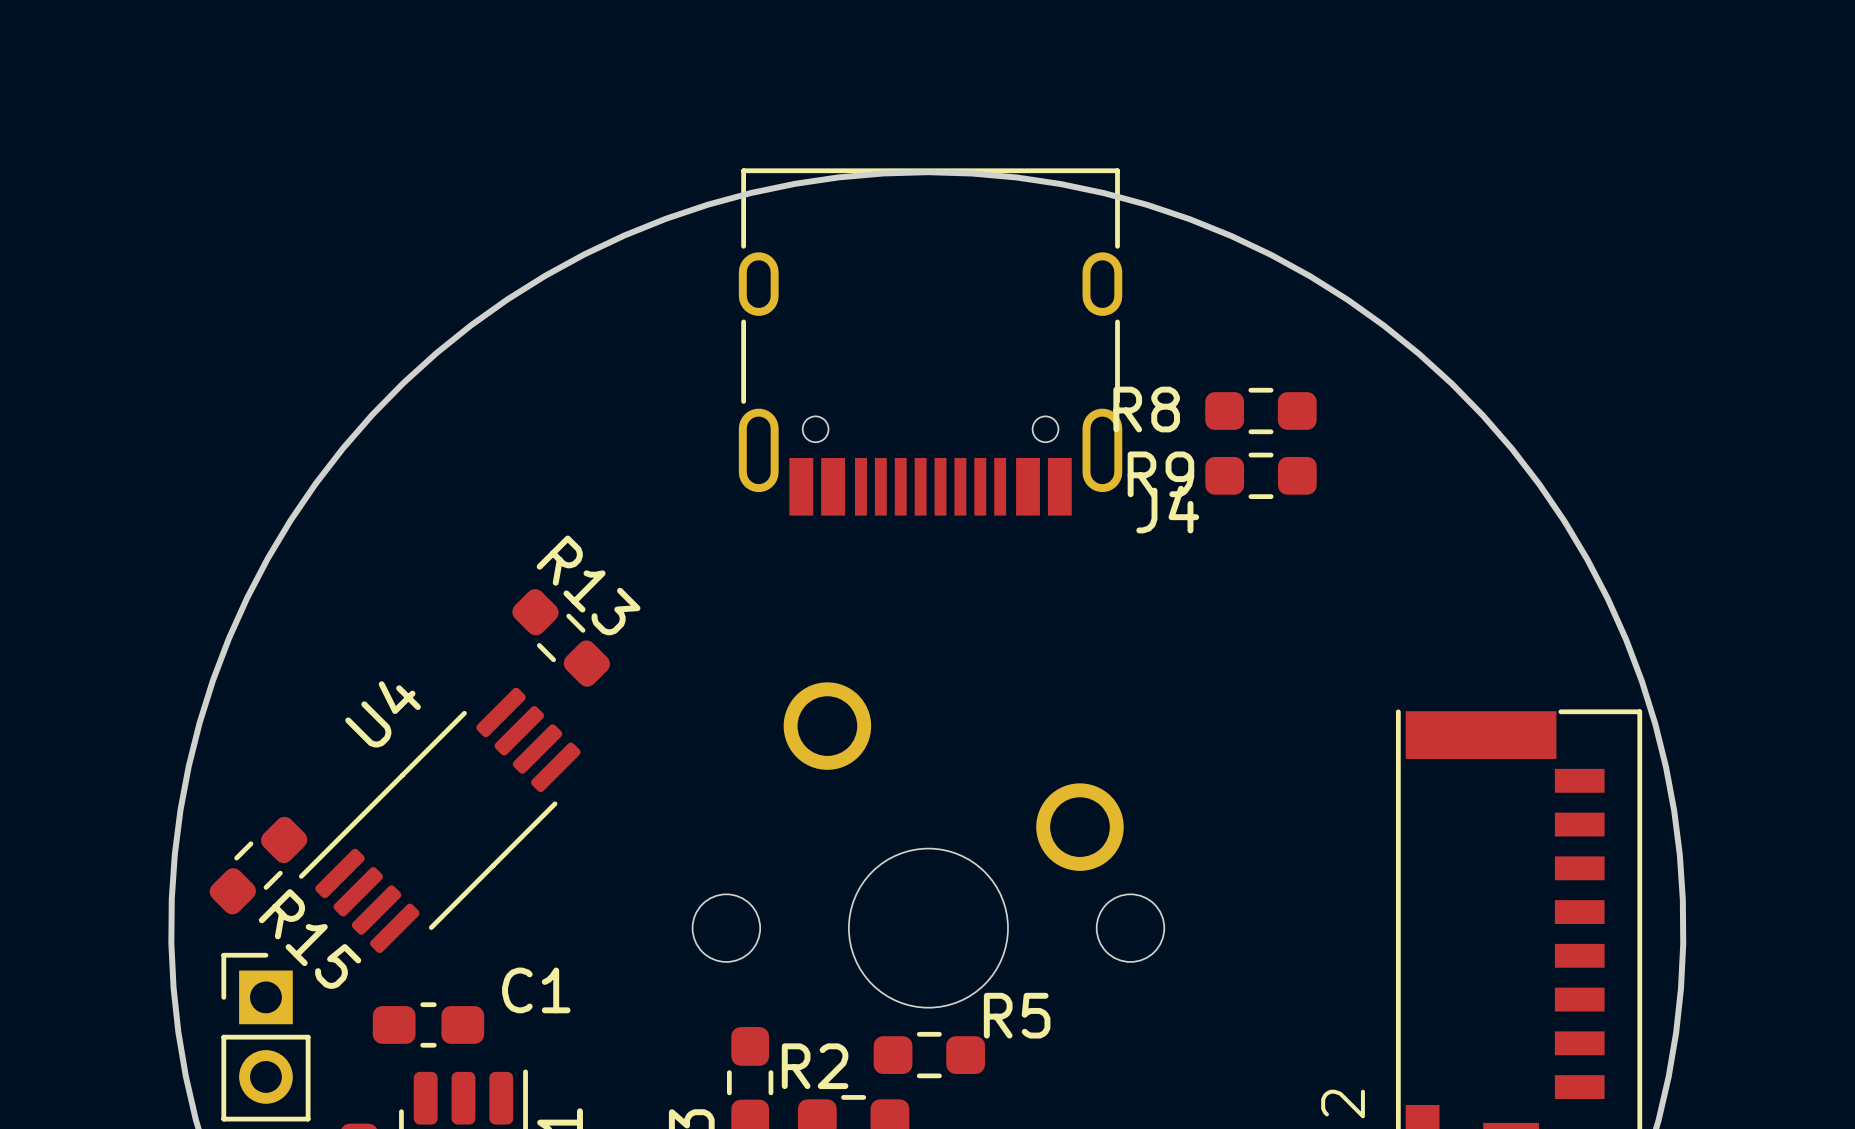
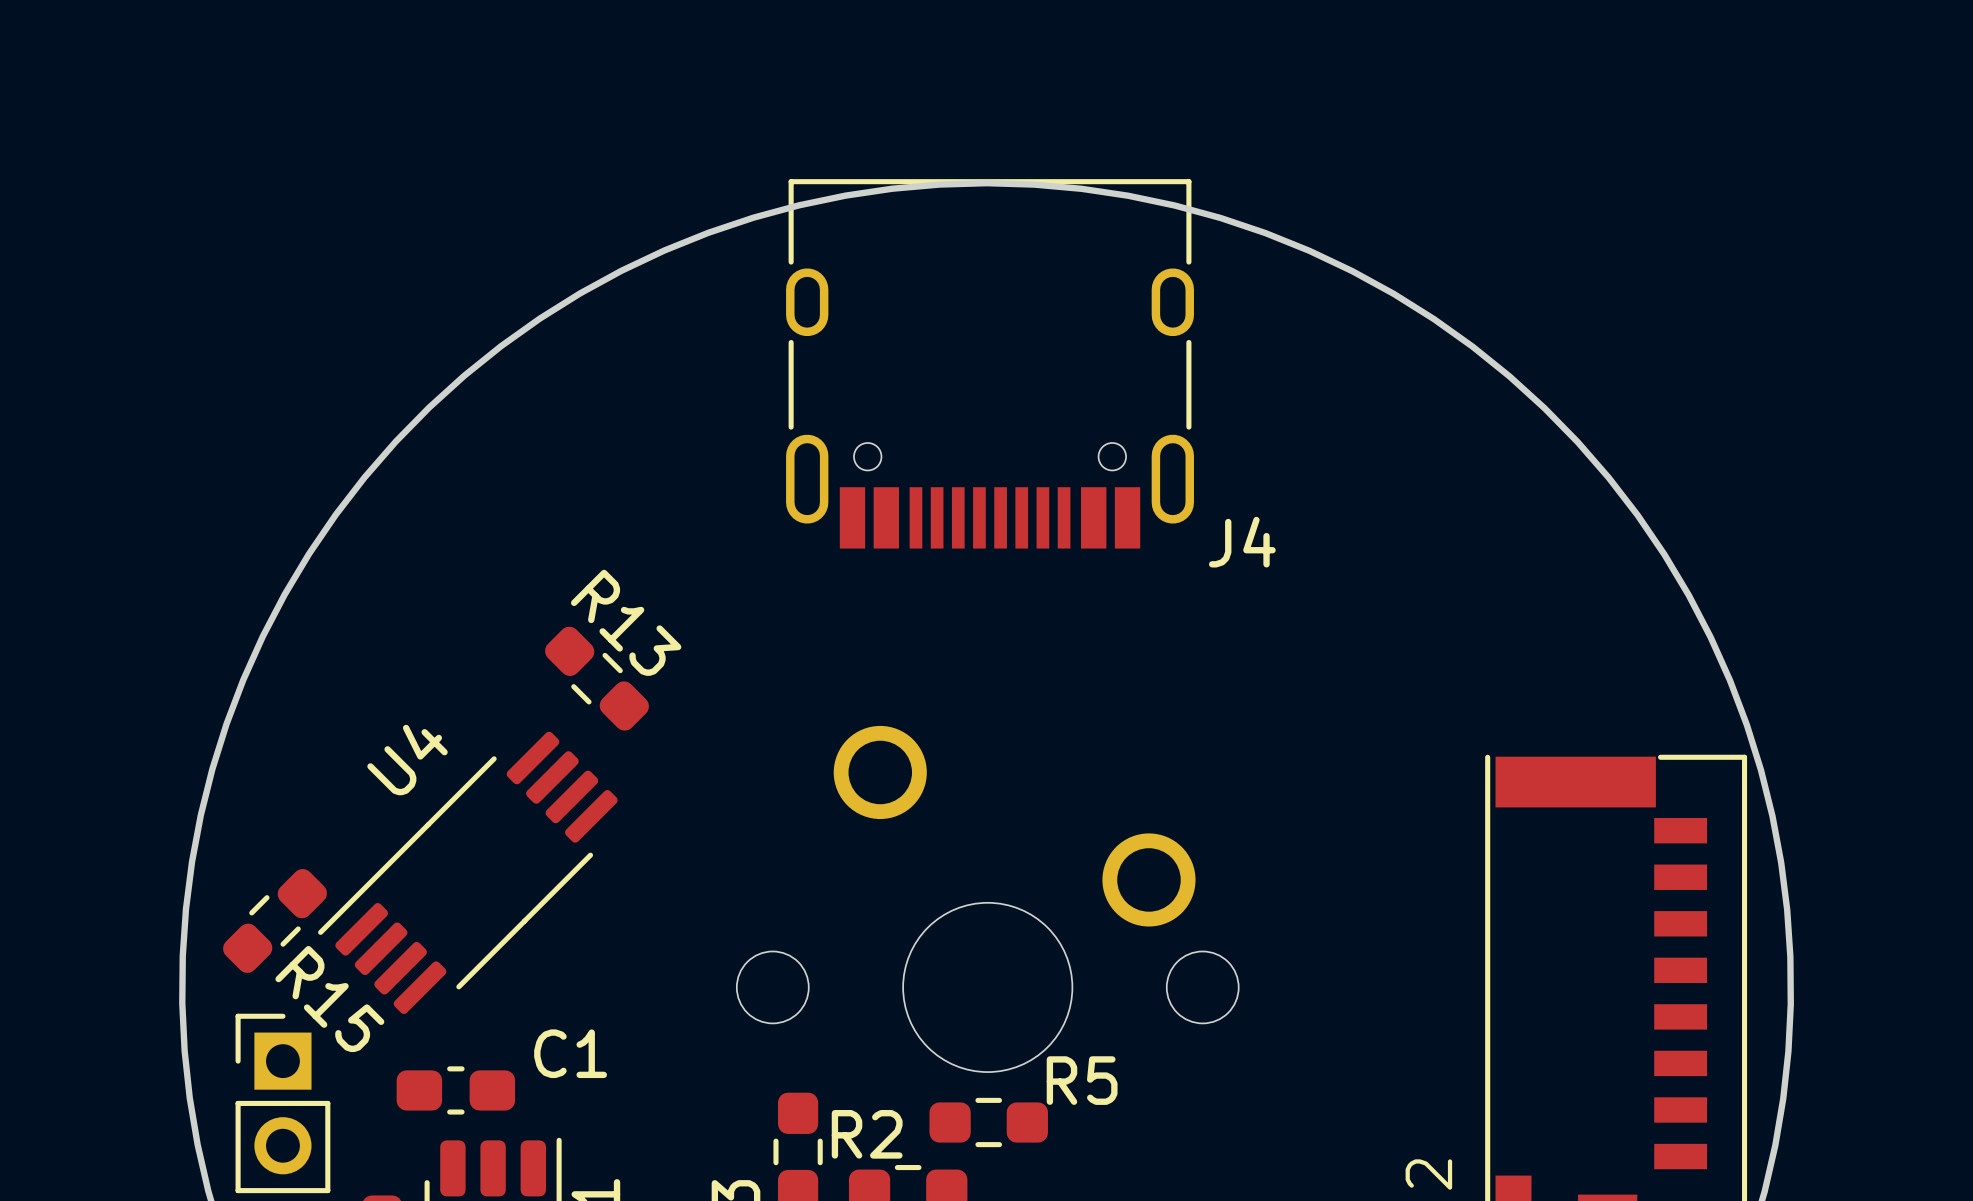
R8: (1260, 411) -> none
R9: (1261, 475) -> none

